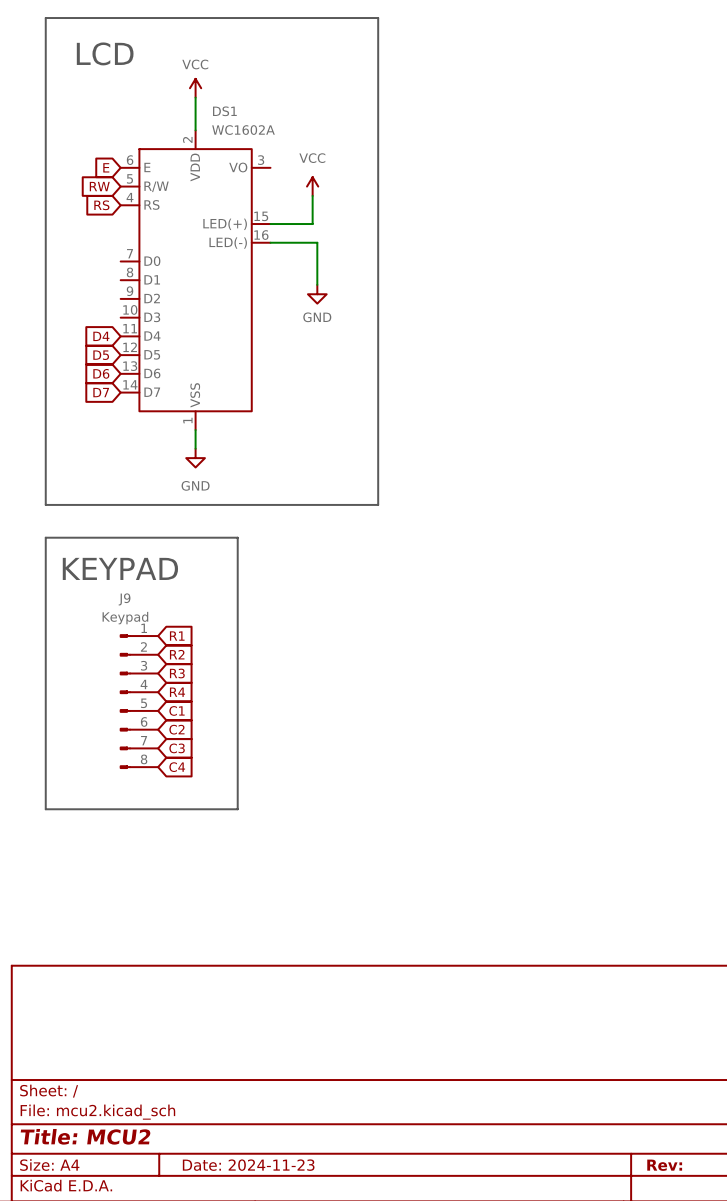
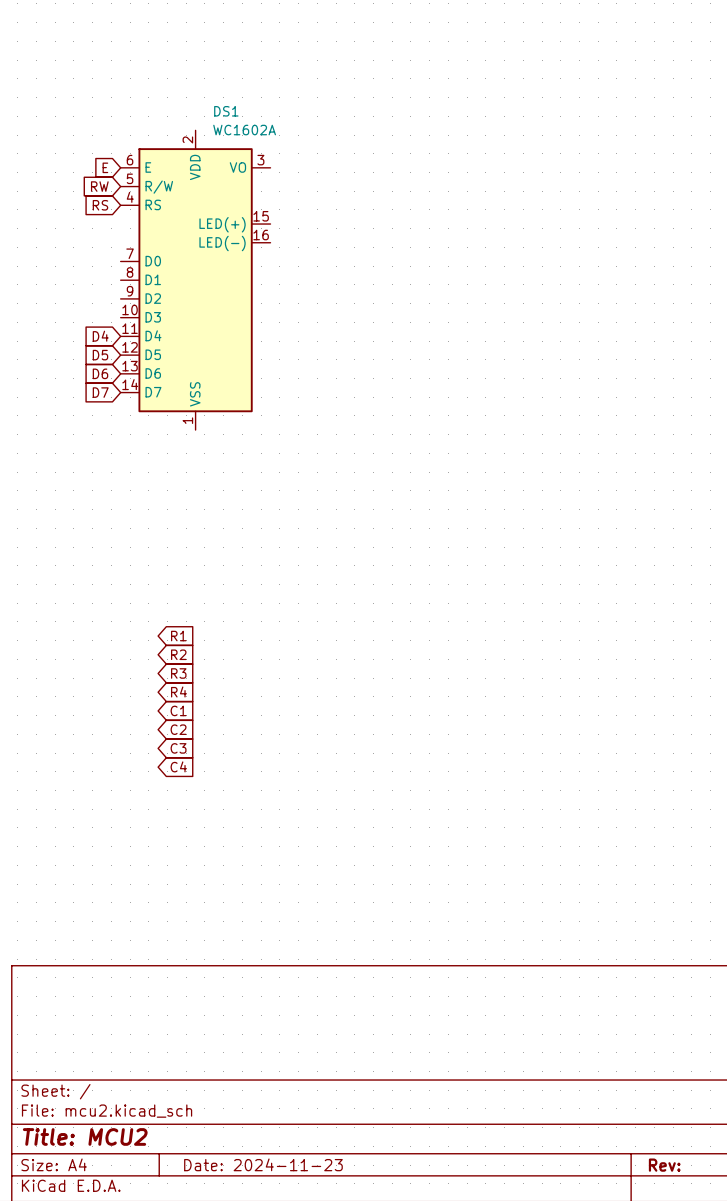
line: (45, 18) (378, 18) (378, 504) (45, 504) (45, 18) -> none
text: LCD (105, 53) -> none
power symbol: VCC (195, 88) -> none
wire: (195, 97) (195, 130) -> none
power symbol: VCC (312, 186) -> none
wire: (312, 195) (312, 224) (270, 224) -> none
wire: (270, 242) (317, 242) (317, 284) -> none
power symbol: GND (317, 294) -> none
wire: (195, 430) (195, 448) -> none
power symbol: GND (195, 458) -> none
line: (45, 537) (45, 809) (237, 809) (237, 537) (45, 537) -> none
text: KEYPAD (120, 568) -> none
J9: Keypad (139, 701) -> none

